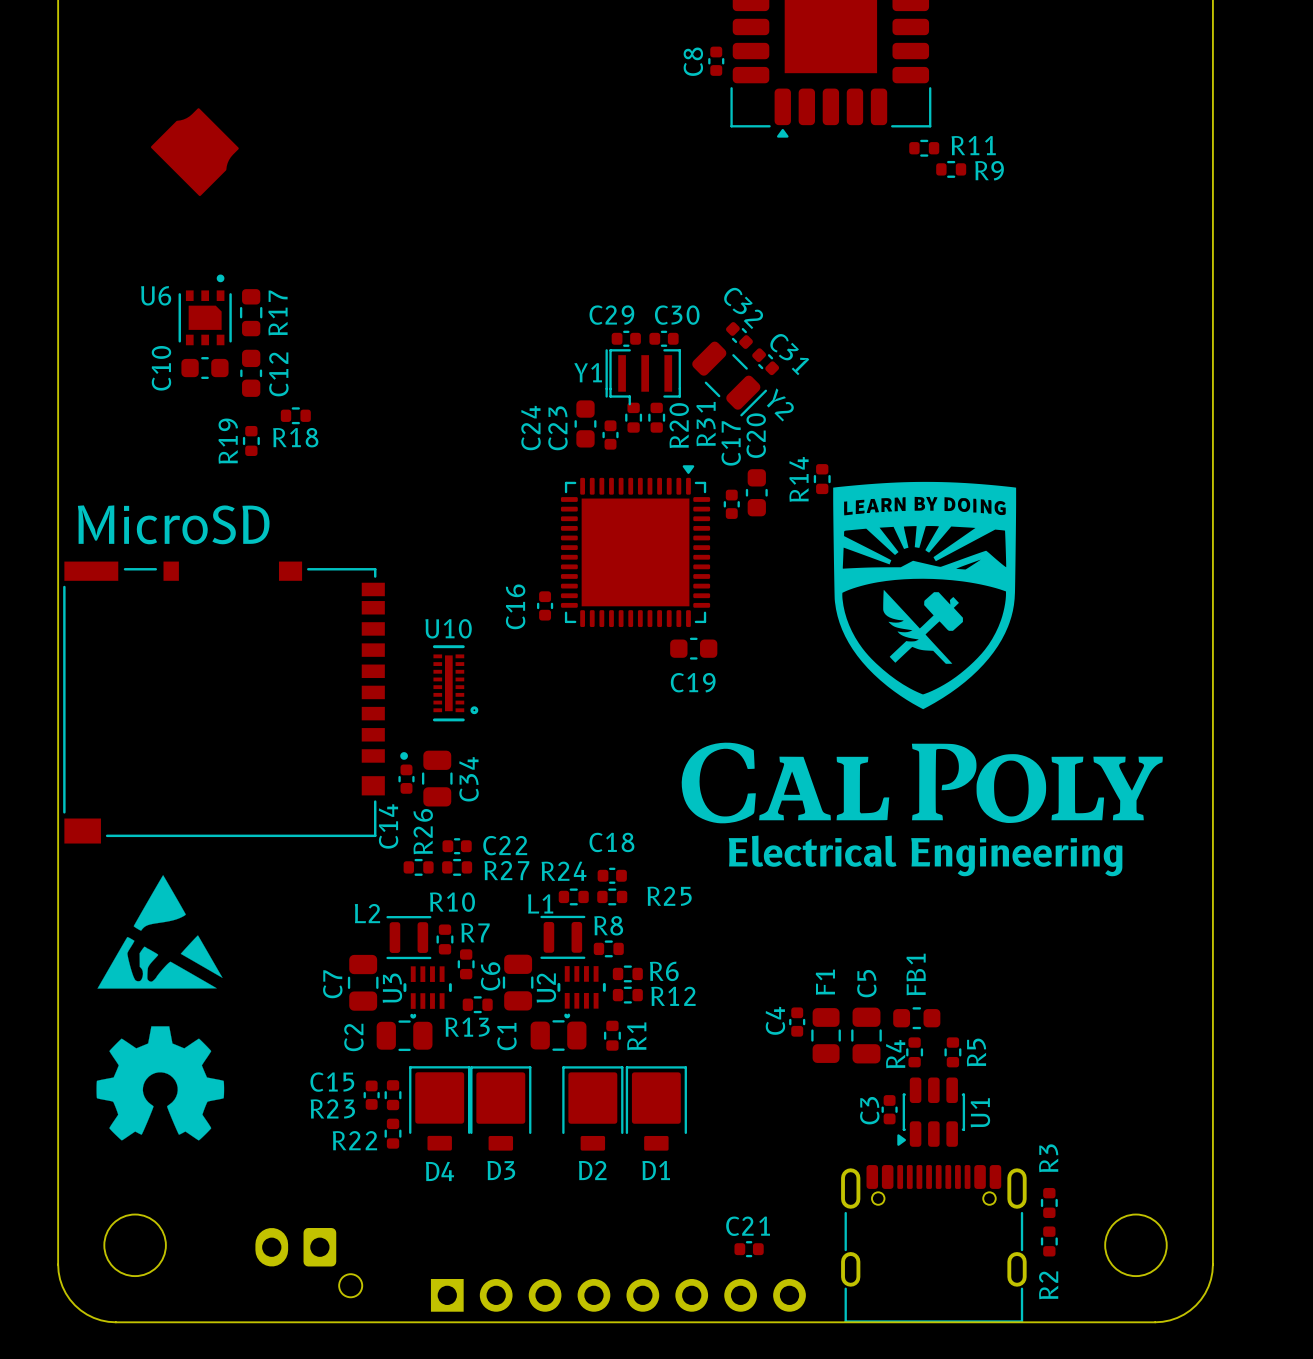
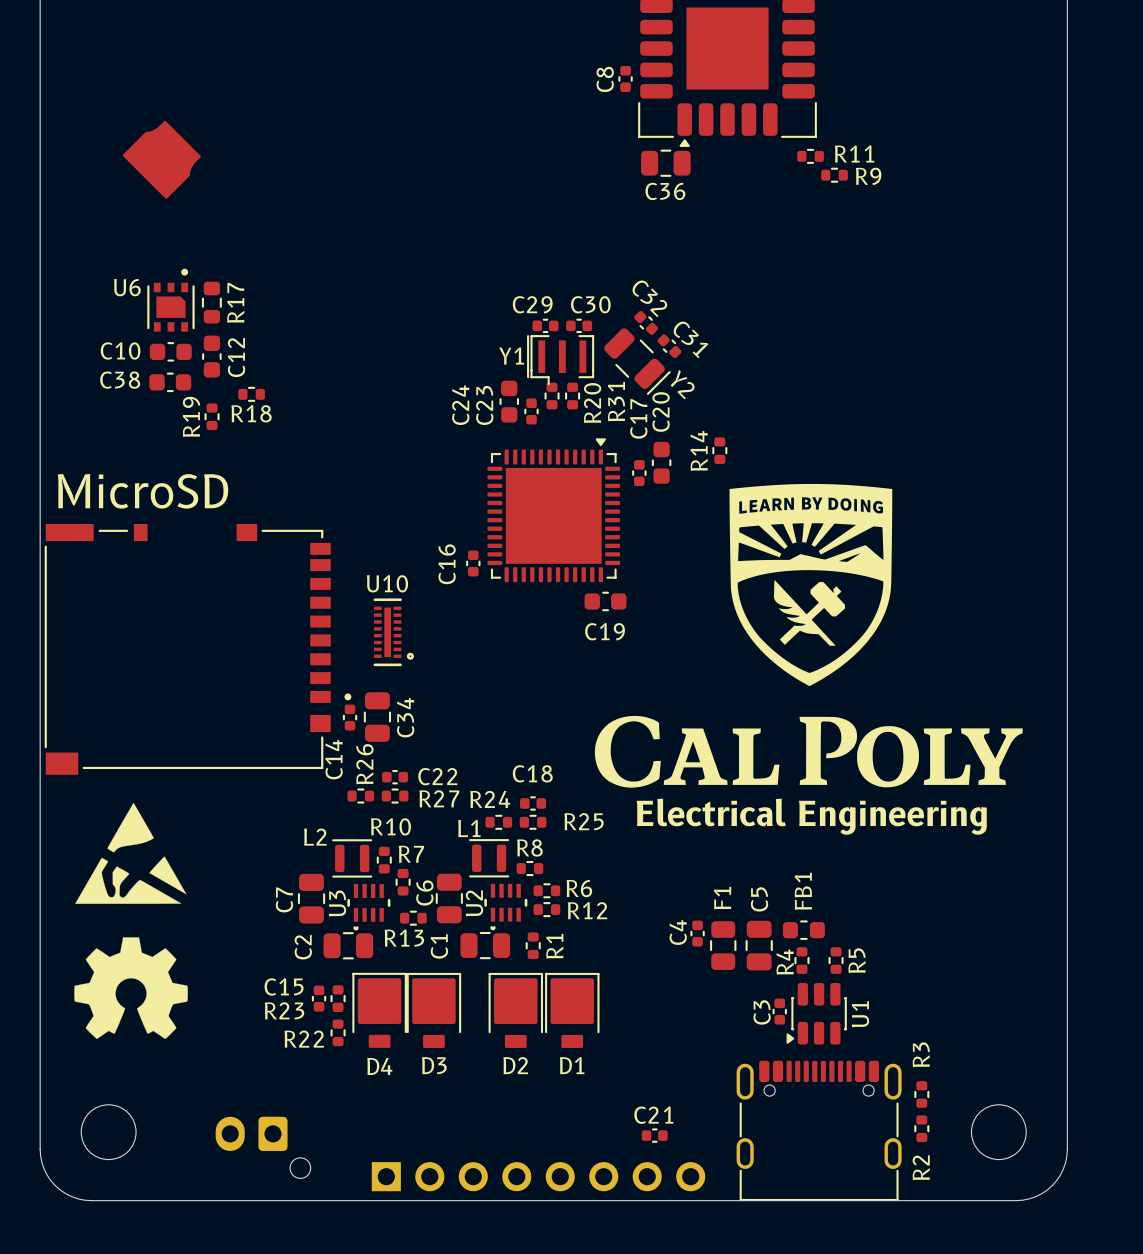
C36: none -> (665, 163)
C10 name rotation: 0° (161, 368) -> 90° clockwise (120, 350)
C38: none -> (170, 382)
drawing position: (922, 652) -> (808, 635)
text position: Electrical Engineering (925, 855) -> Electrical Engineering (811, 816)

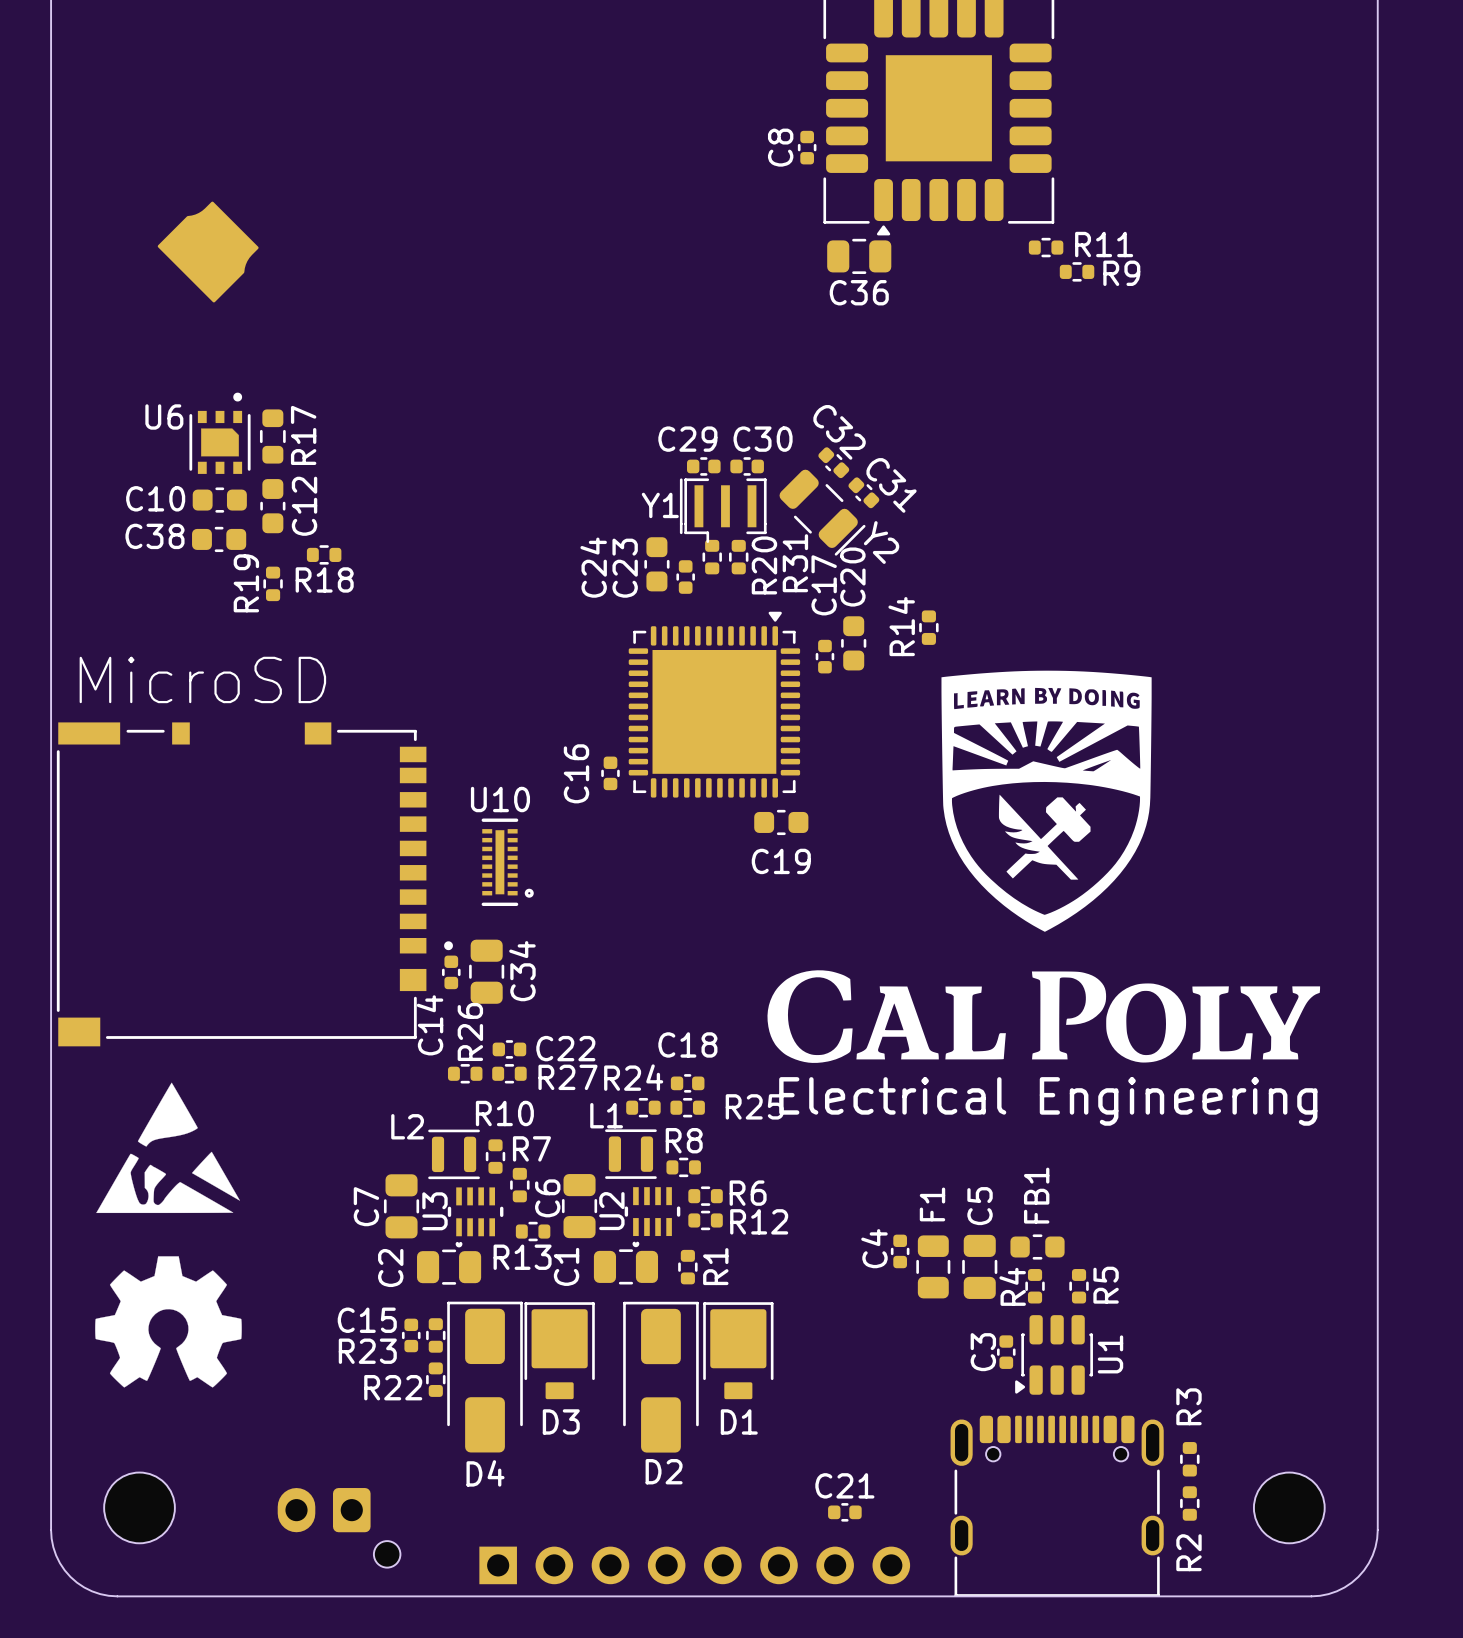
D4 footprint: [352, 972, 407, 1048] -> [447, 1301, 523, 1453]
D2 footprint: [488, 972, 544, 1048] -> [623, 1301, 699, 1453]

